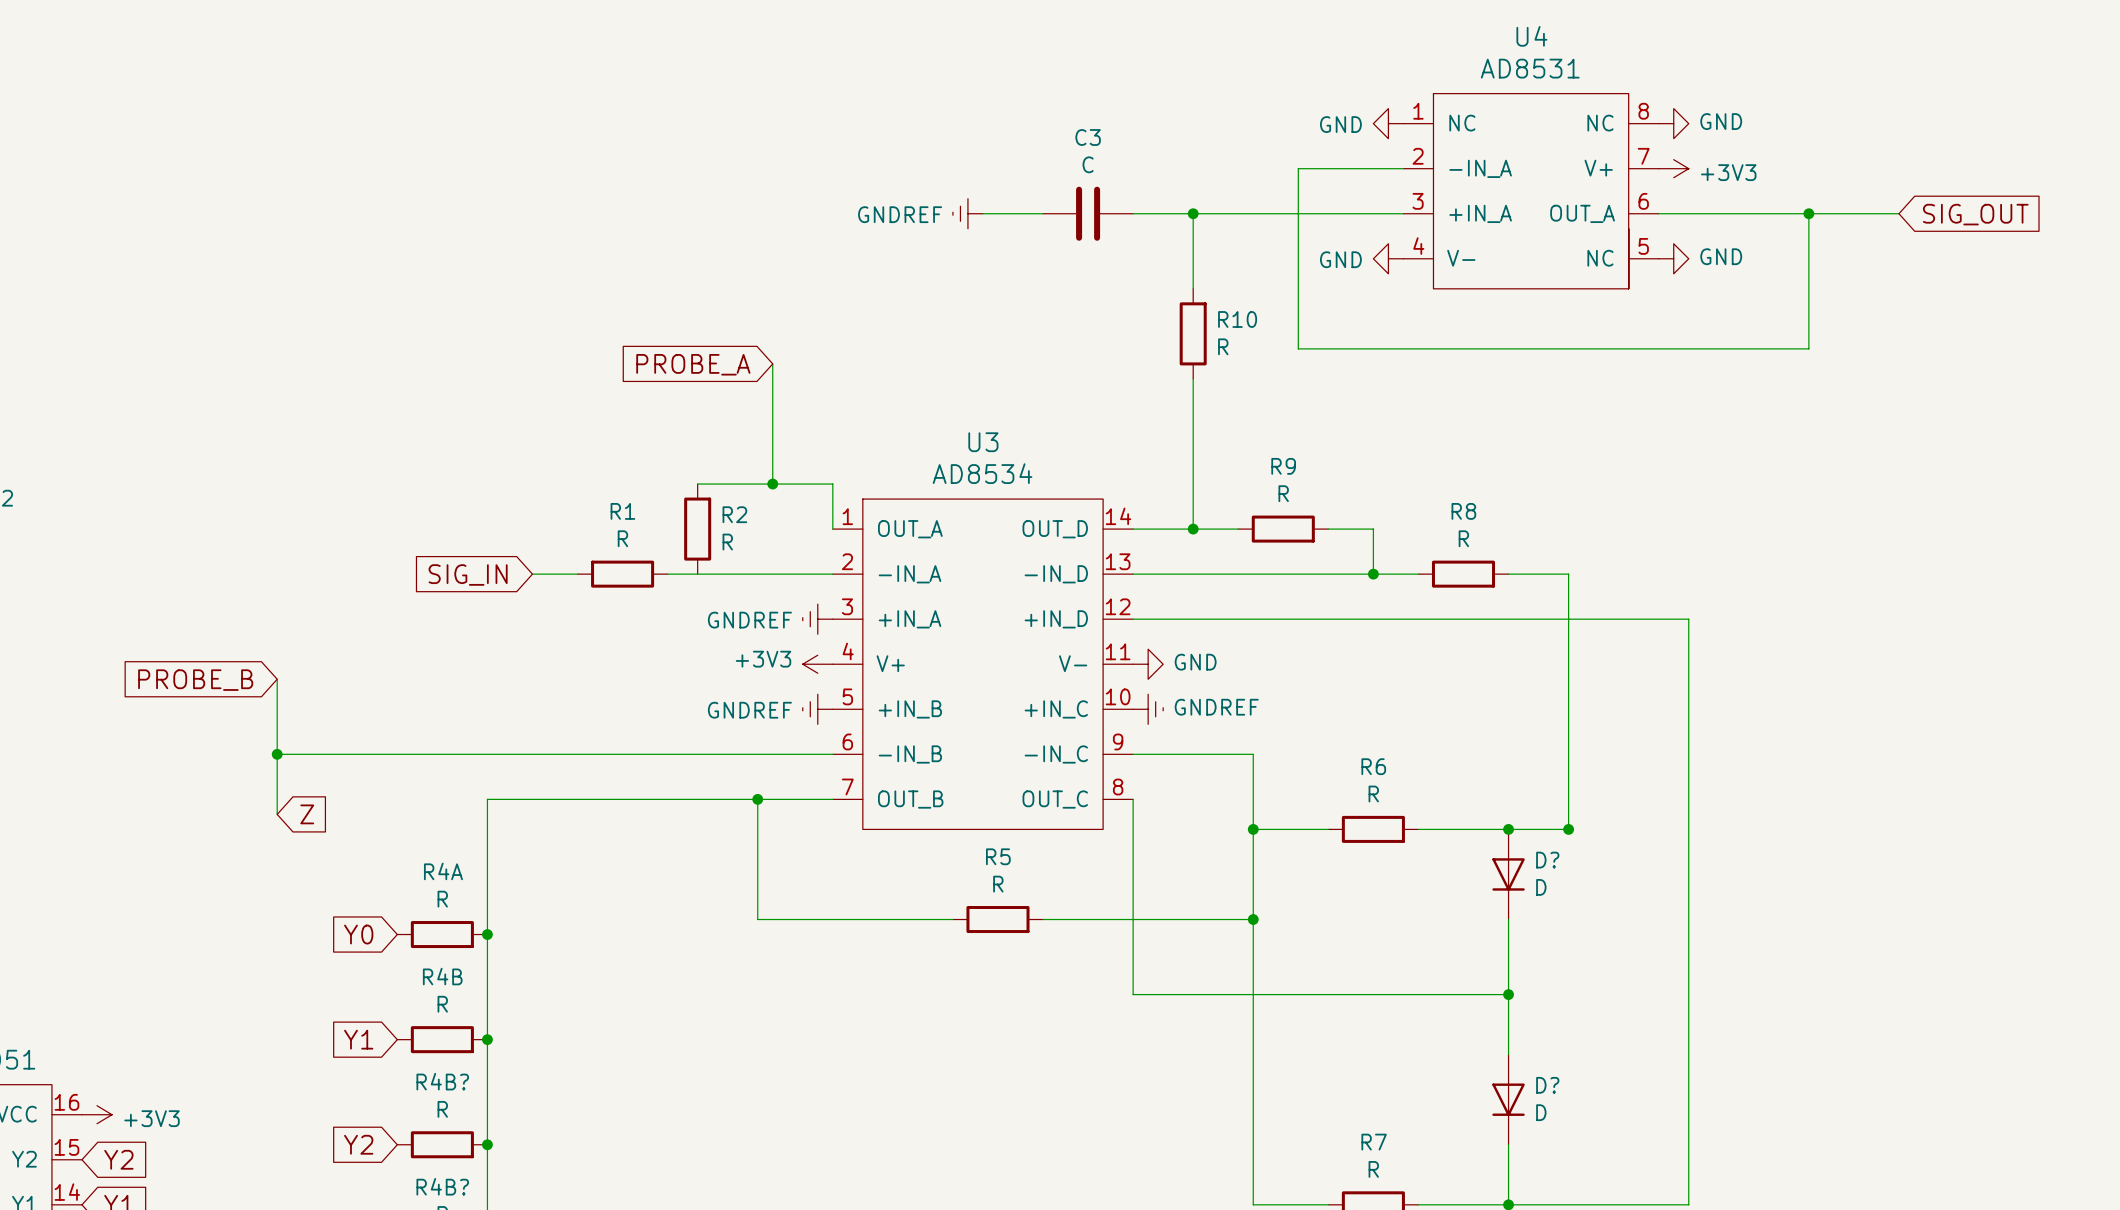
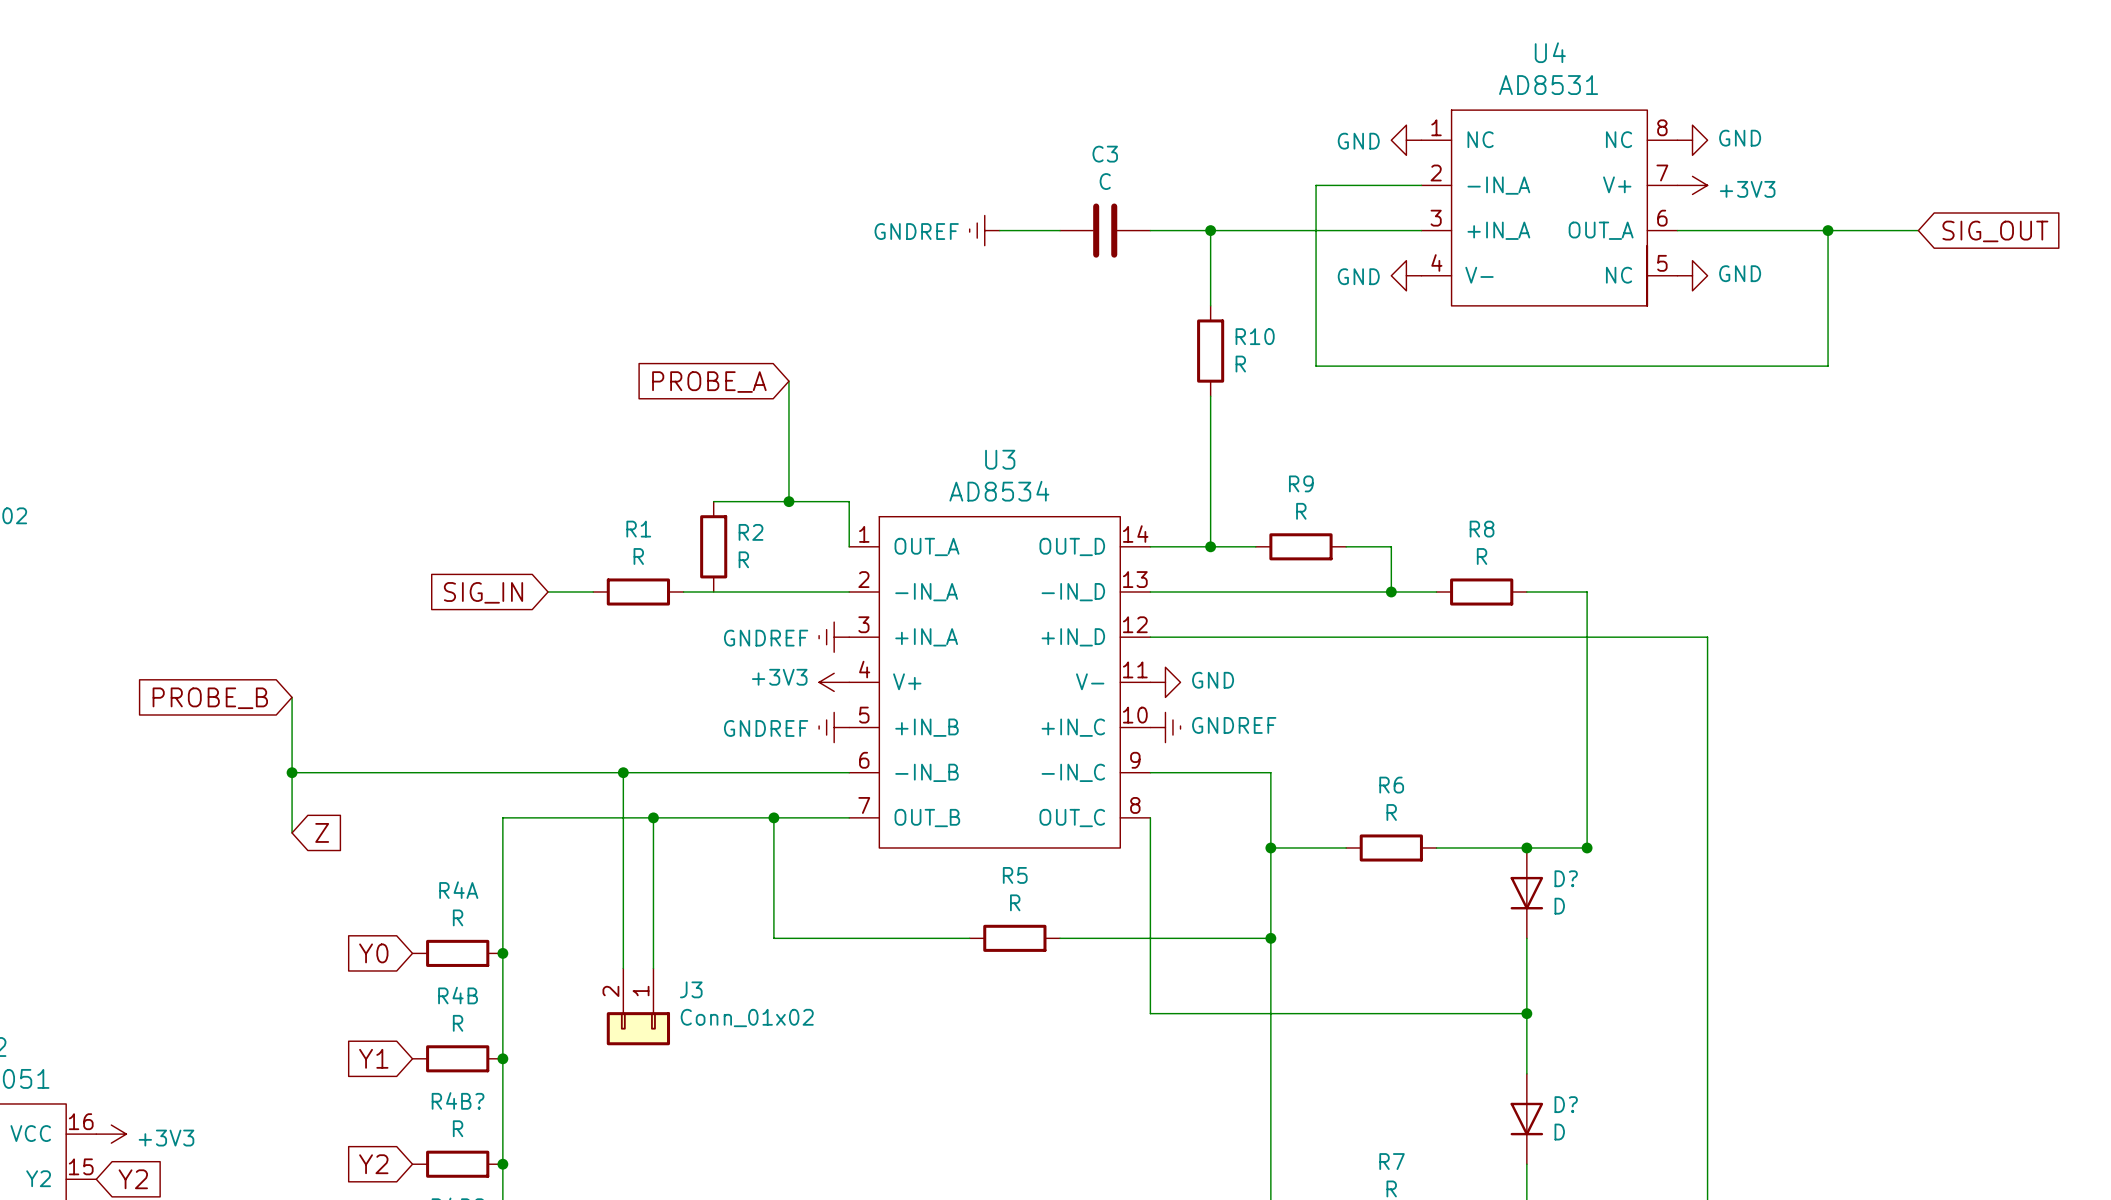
wire: none -> (623, 772) (623, 968)
junction: none -> (623, 772)
wire: none -> (653, 817) (653, 968)
junction: none -> (653, 817)
J3: none -> Conn_01x02 (638, 1006)

